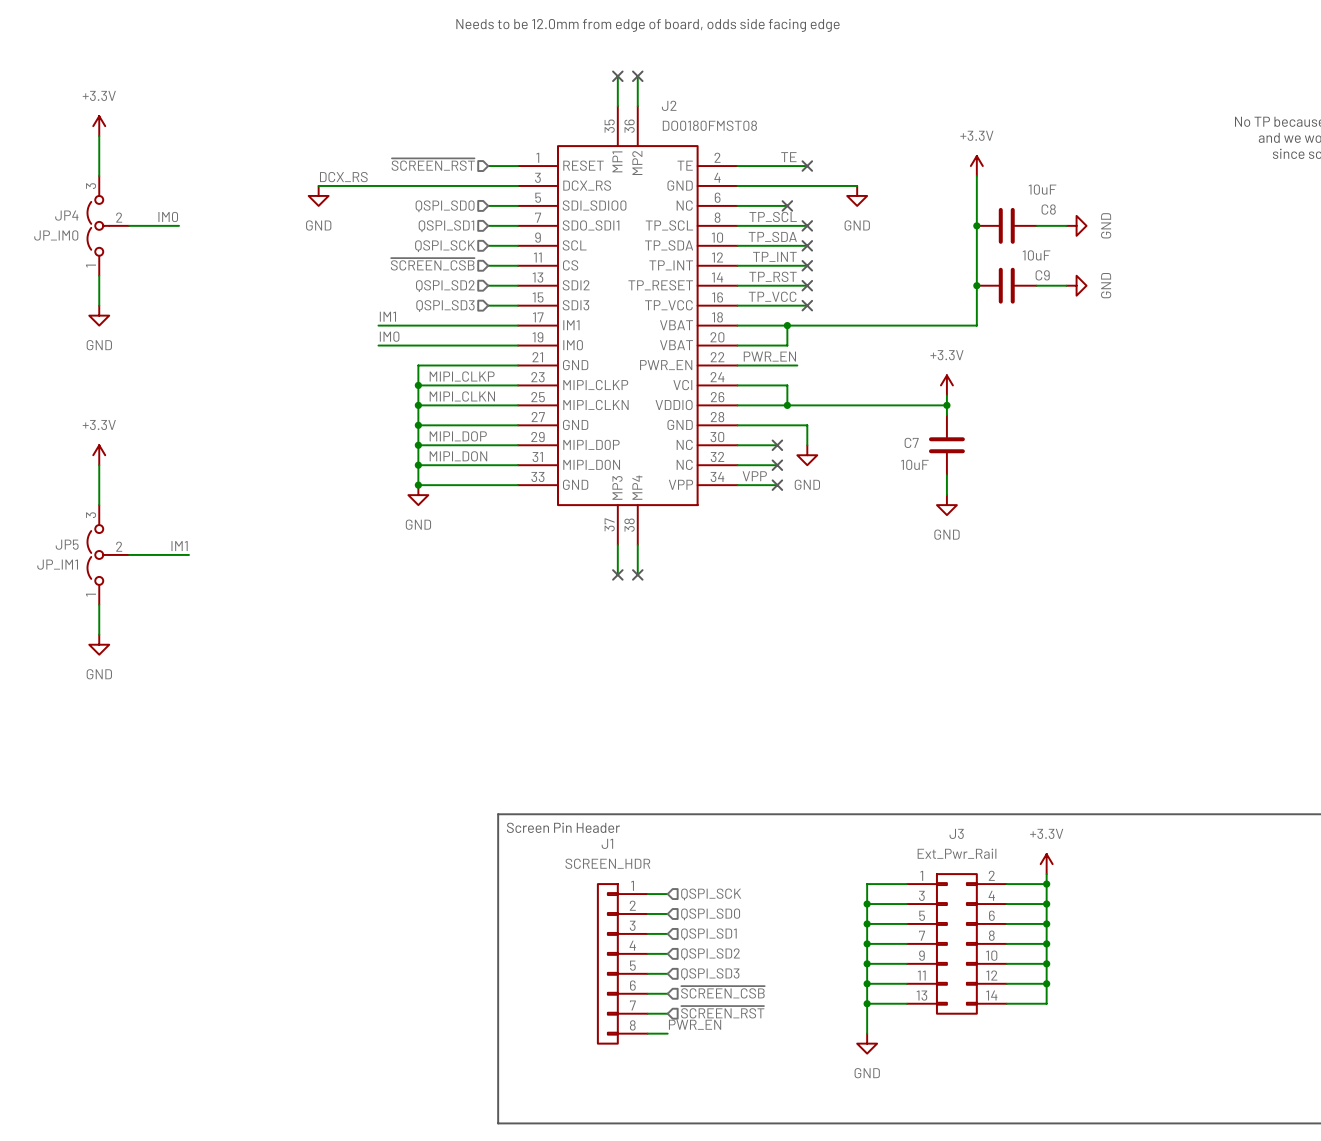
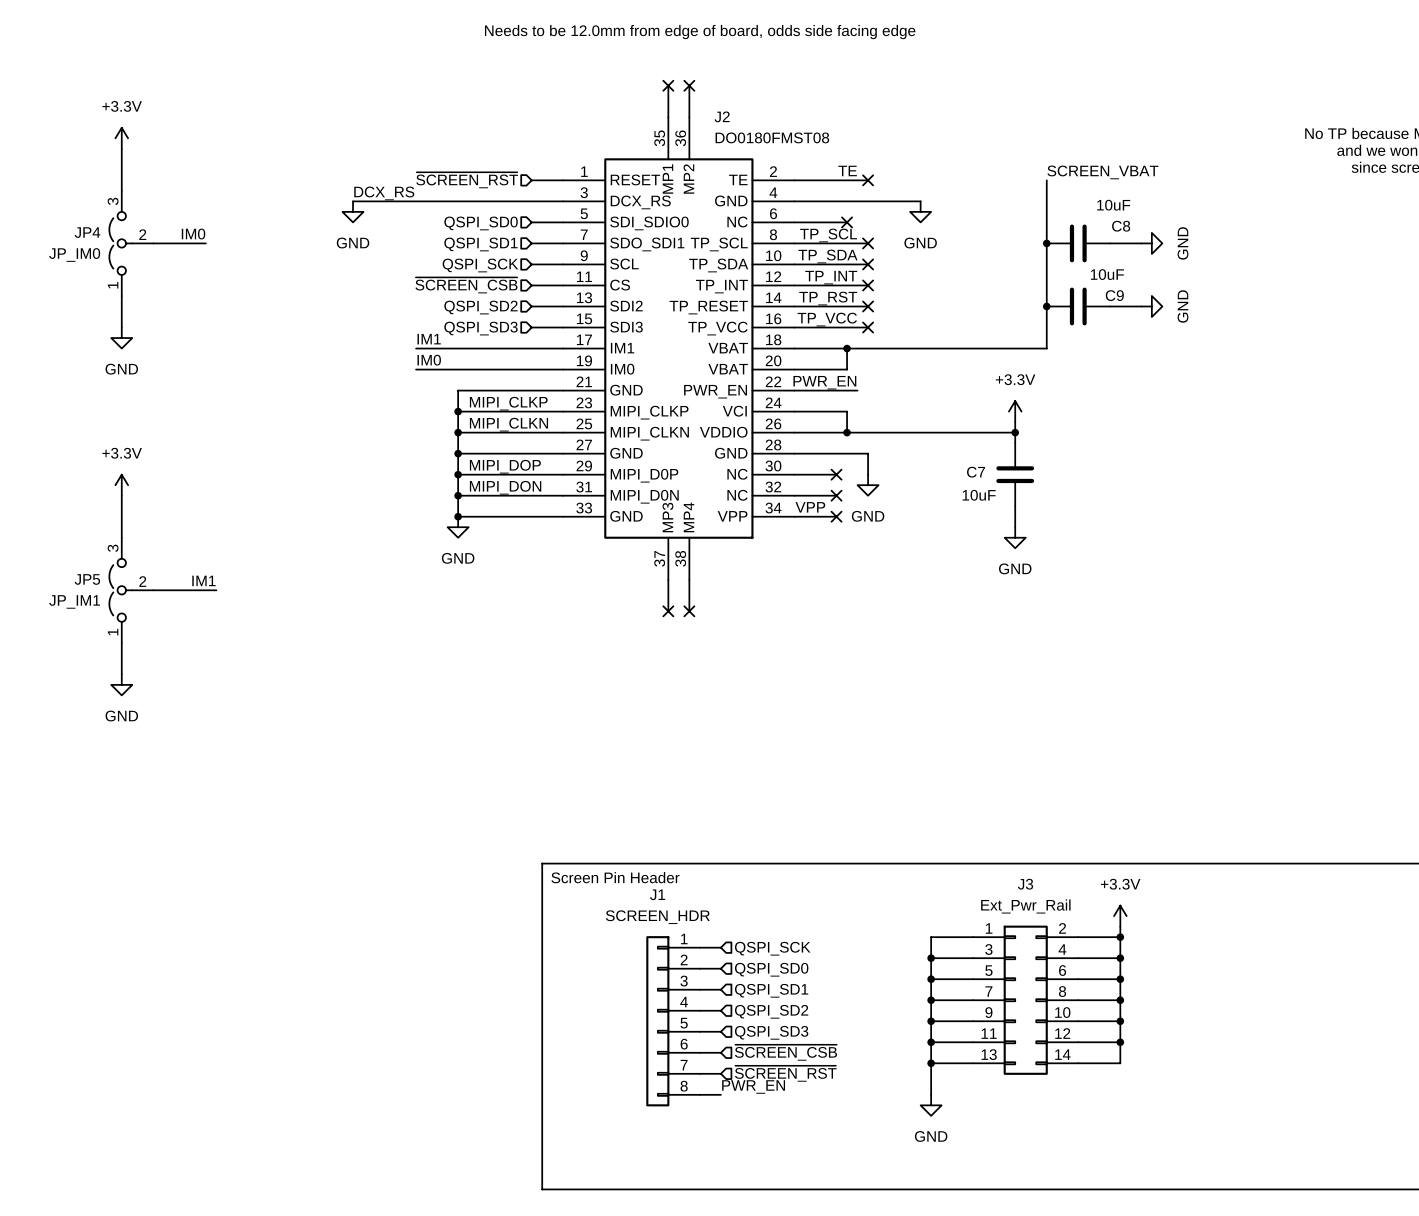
label: none -> SCREEN_VBAT (1102, 172)
power symbol: +3.3V (976, 166) -> none

